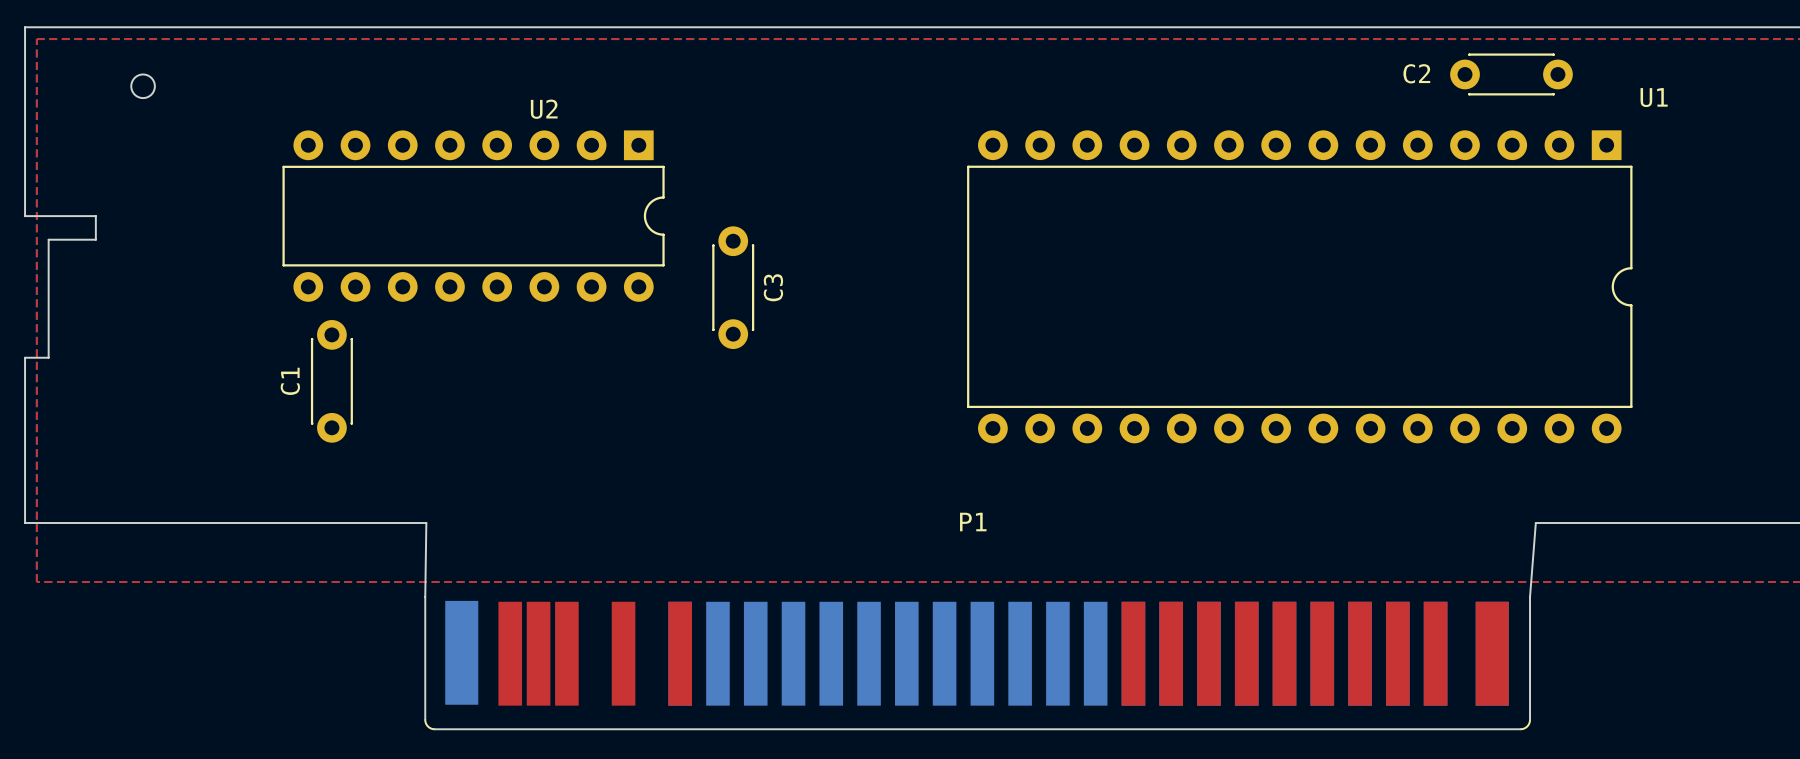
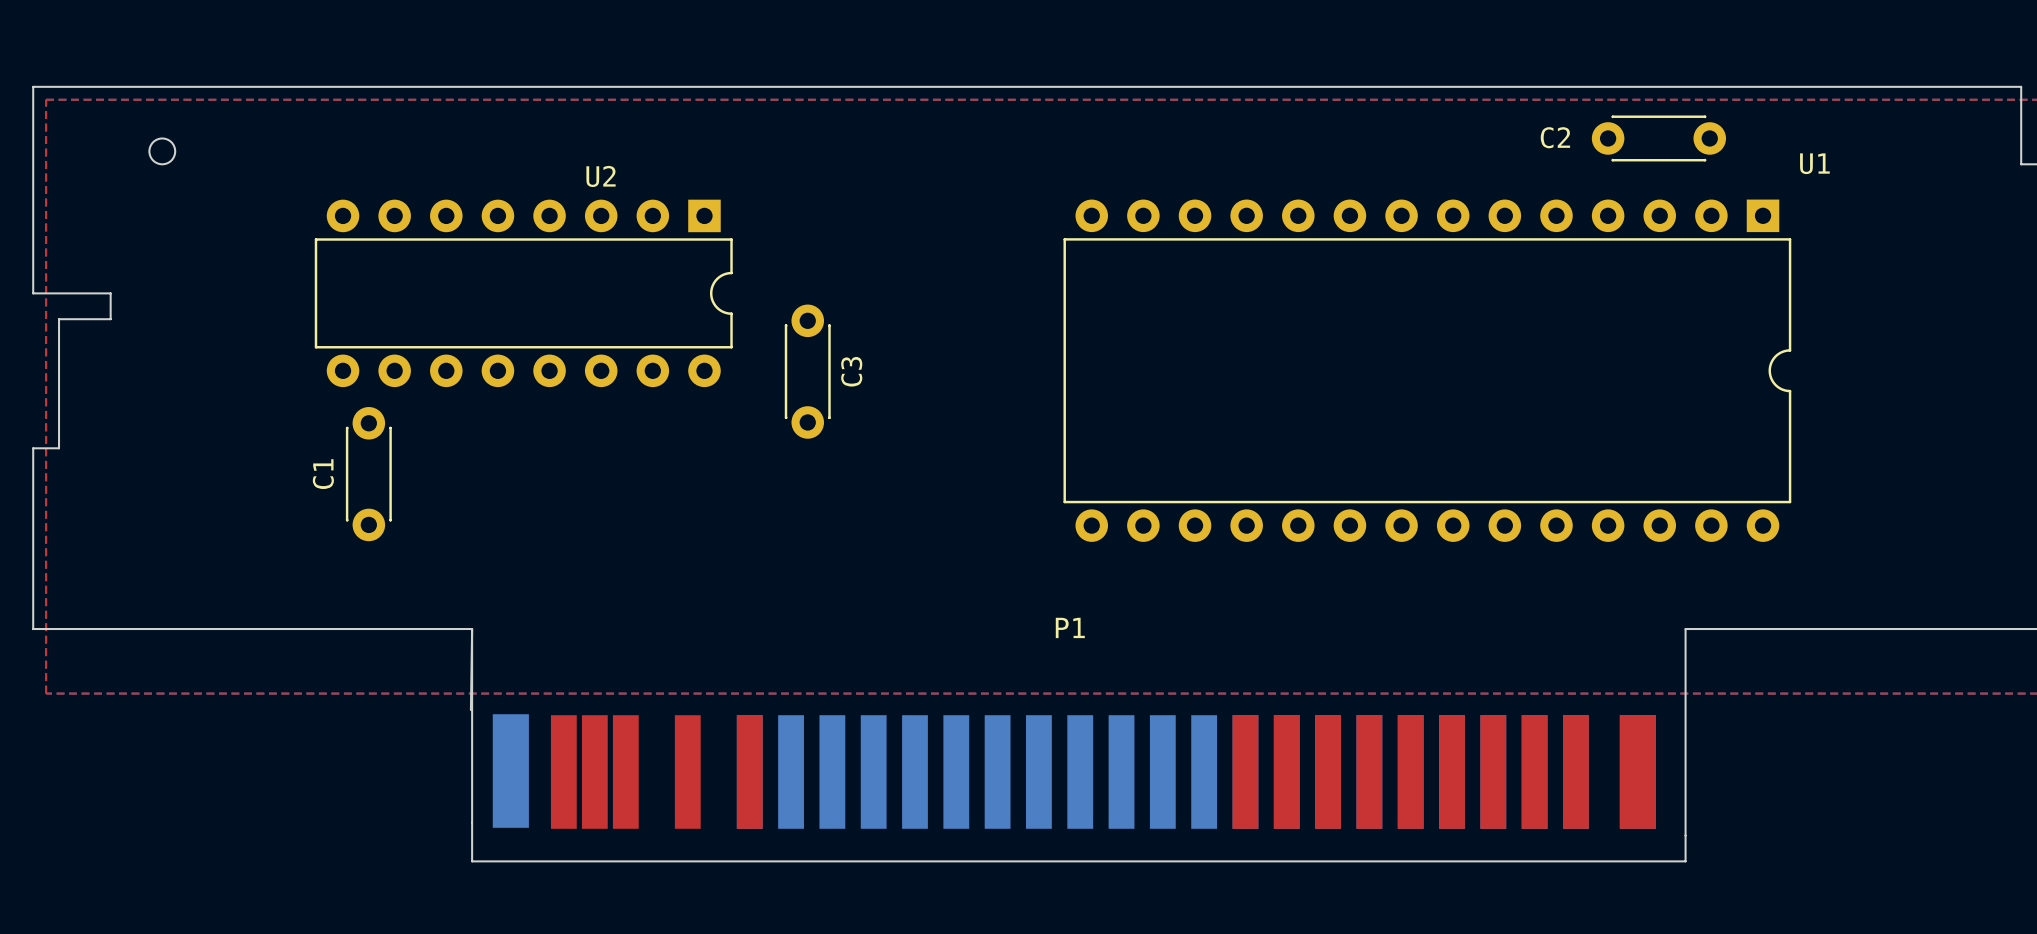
board edge: (1535, 522) (1530, 597) -> (1685, 629) (1685, 861) (472, 861) (472, 629)
P1 footprint: [424, 596, 1531, 730] -> [492, 714, 1656, 829]

